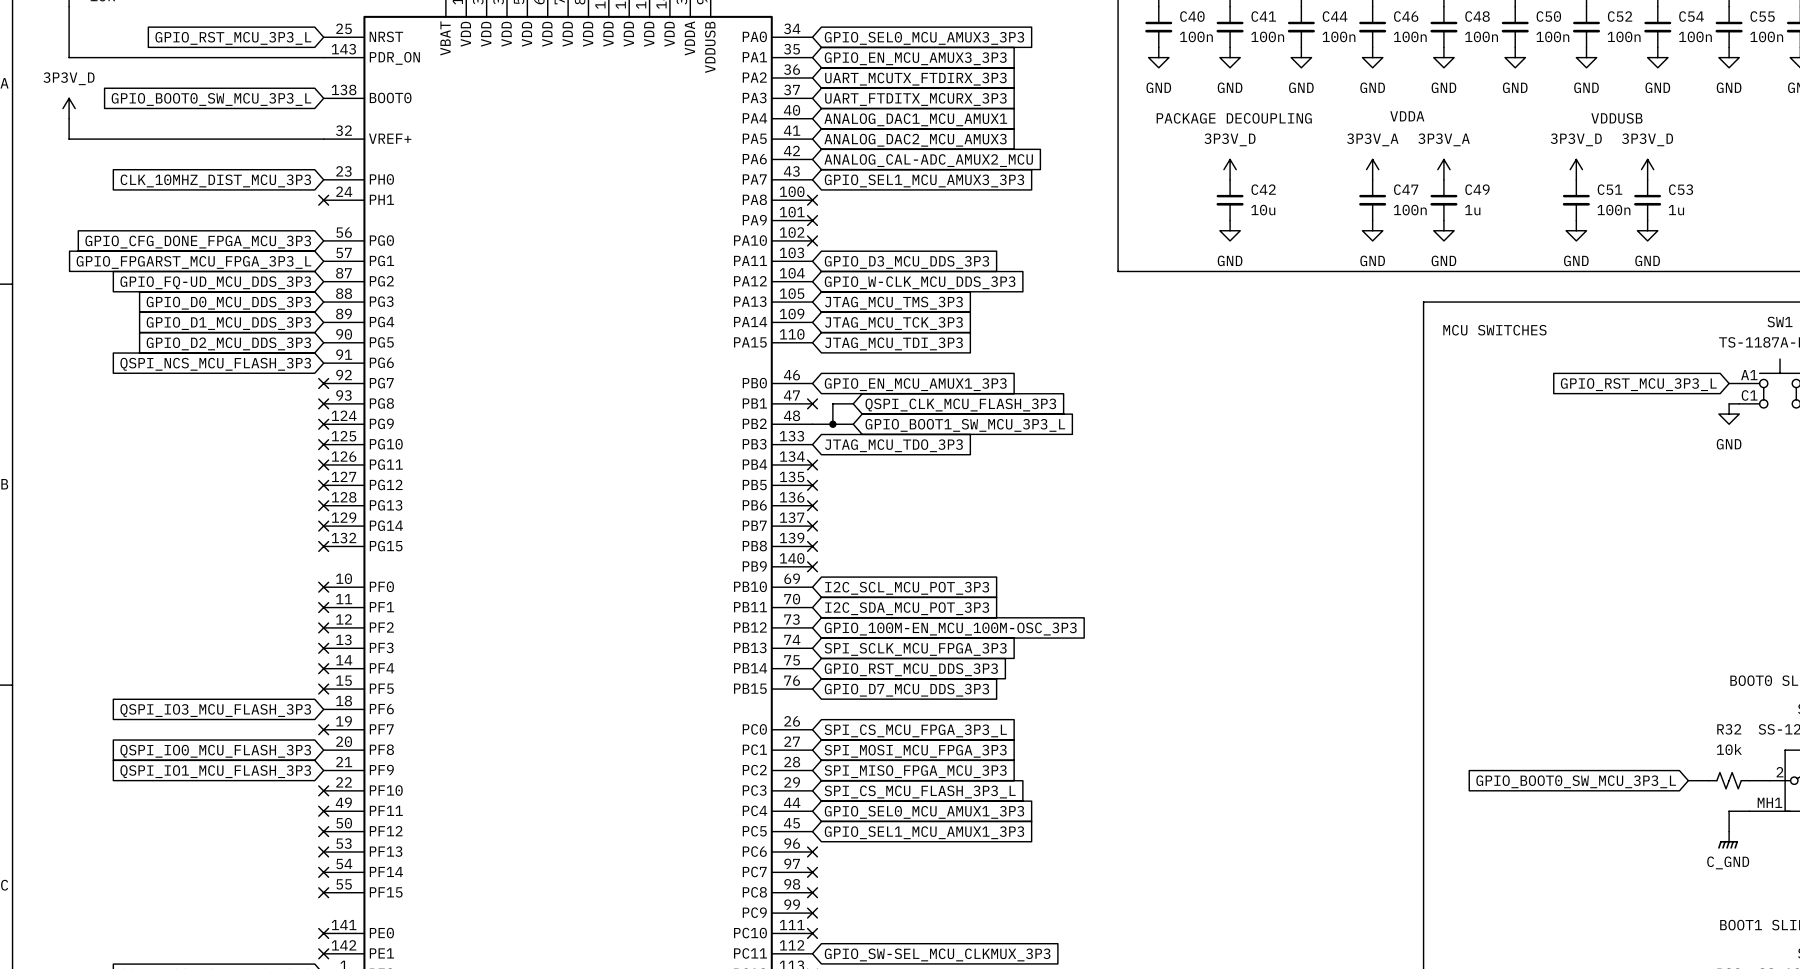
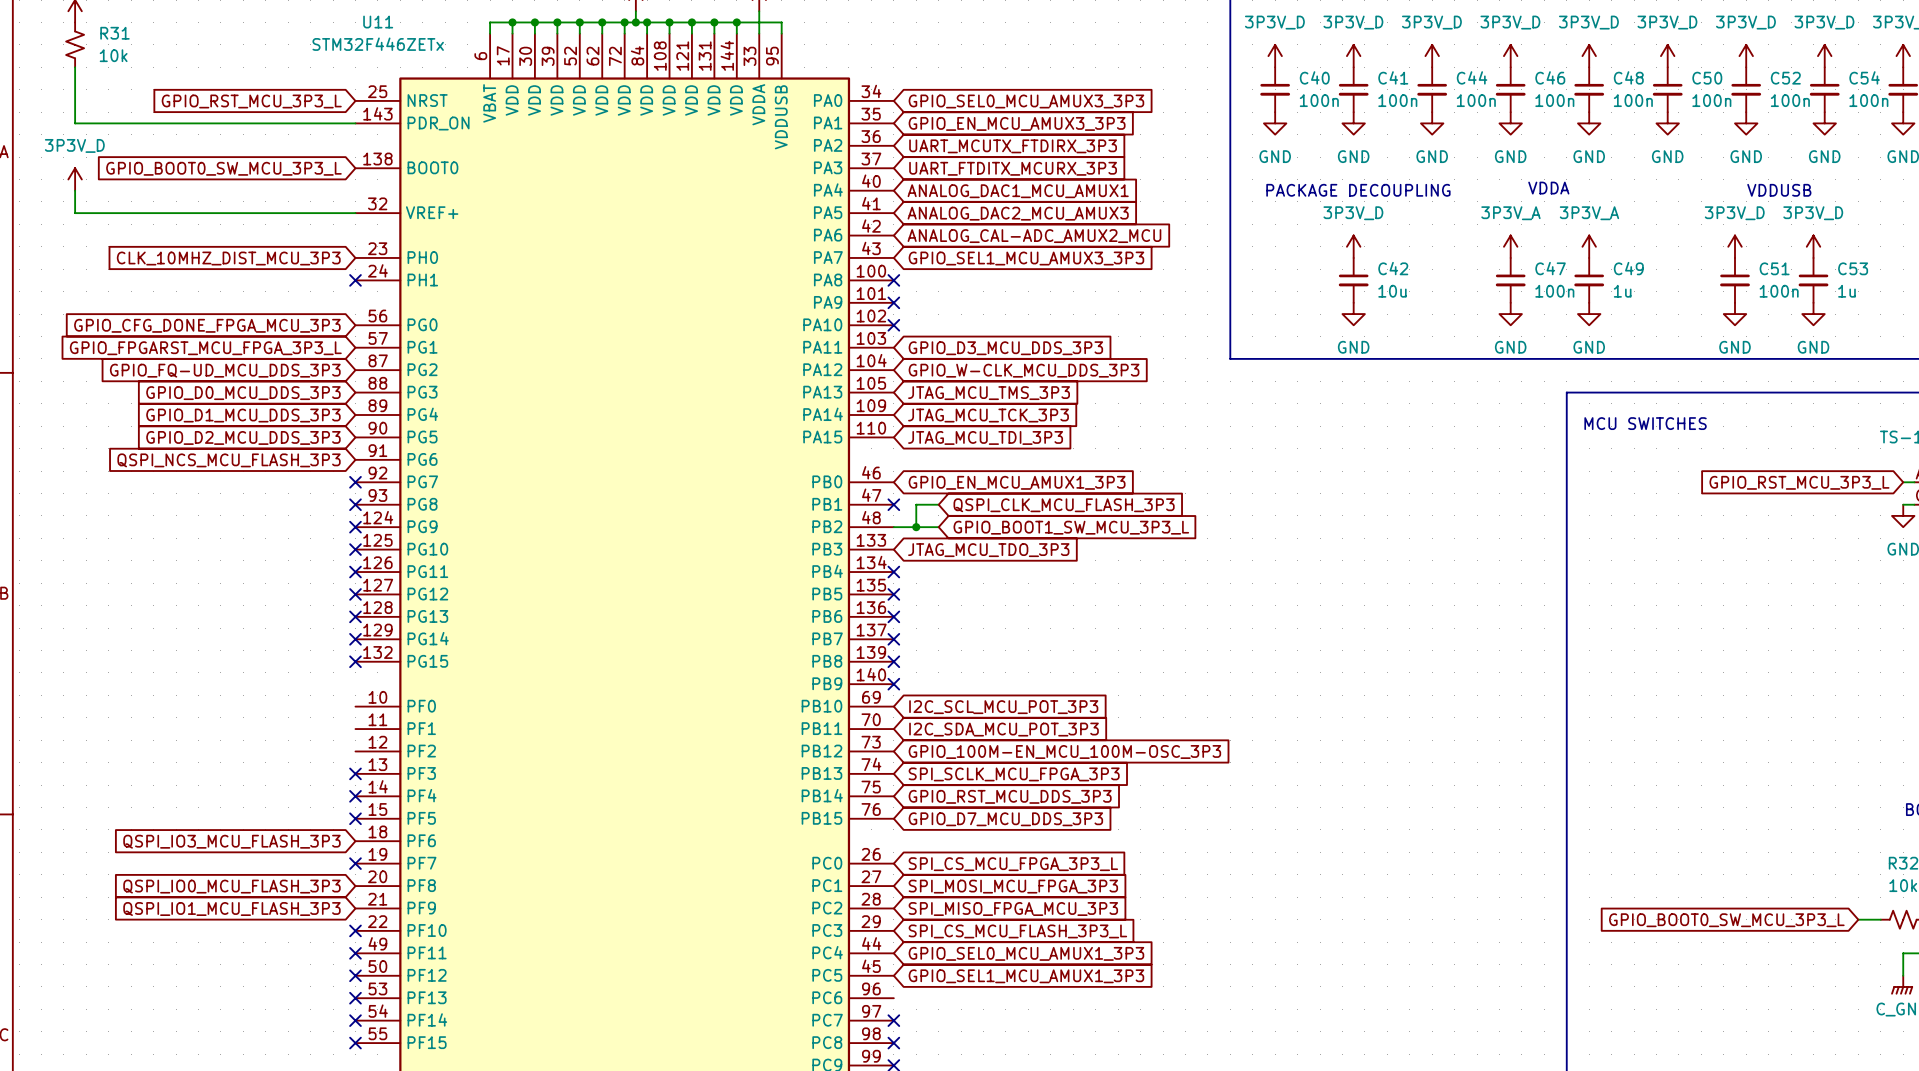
no-connect mark: (323, 587) -> none
no-connect mark: (323, 607) -> none
no-connect mark: (323, 627) -> none
no-connect mark: (812, 851) -> none

